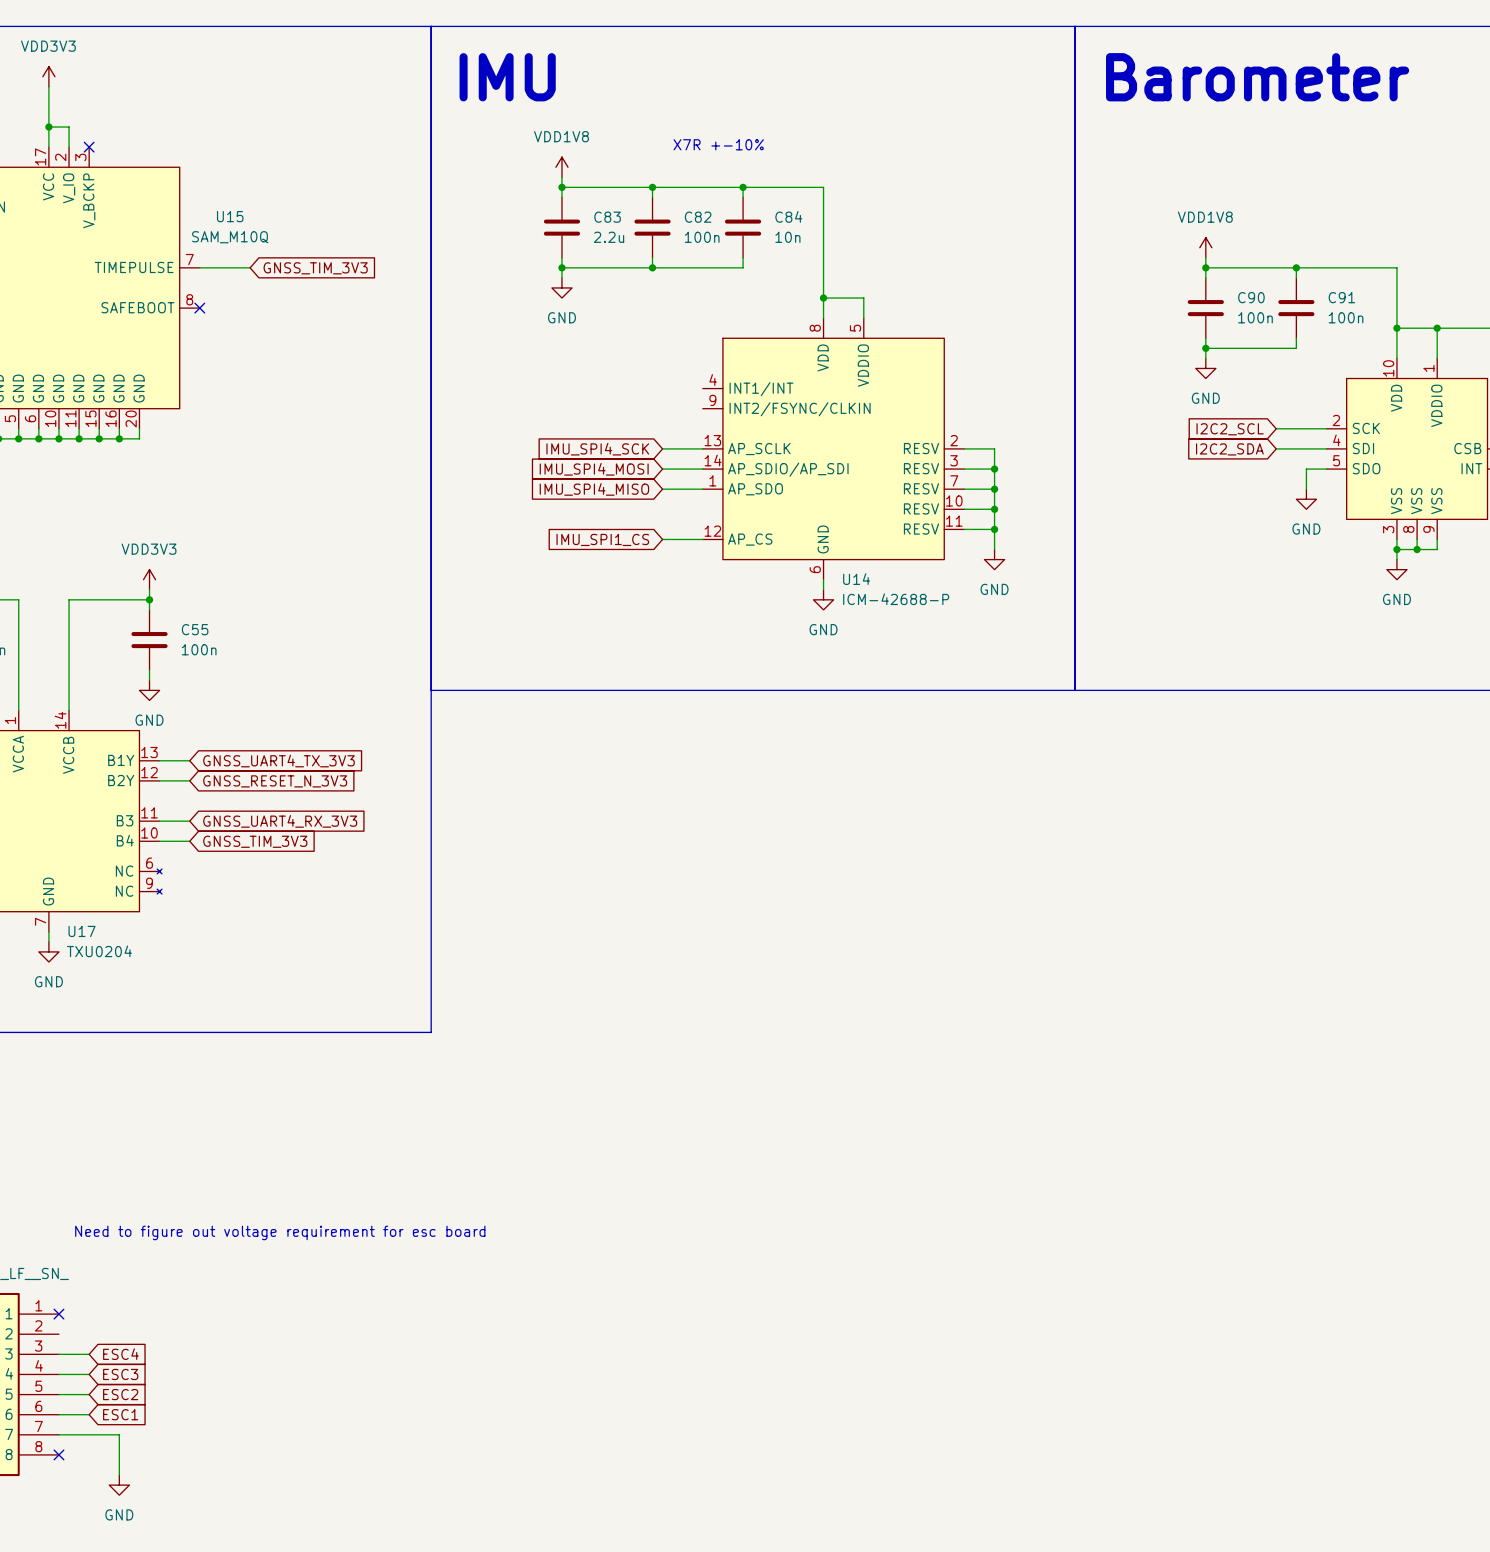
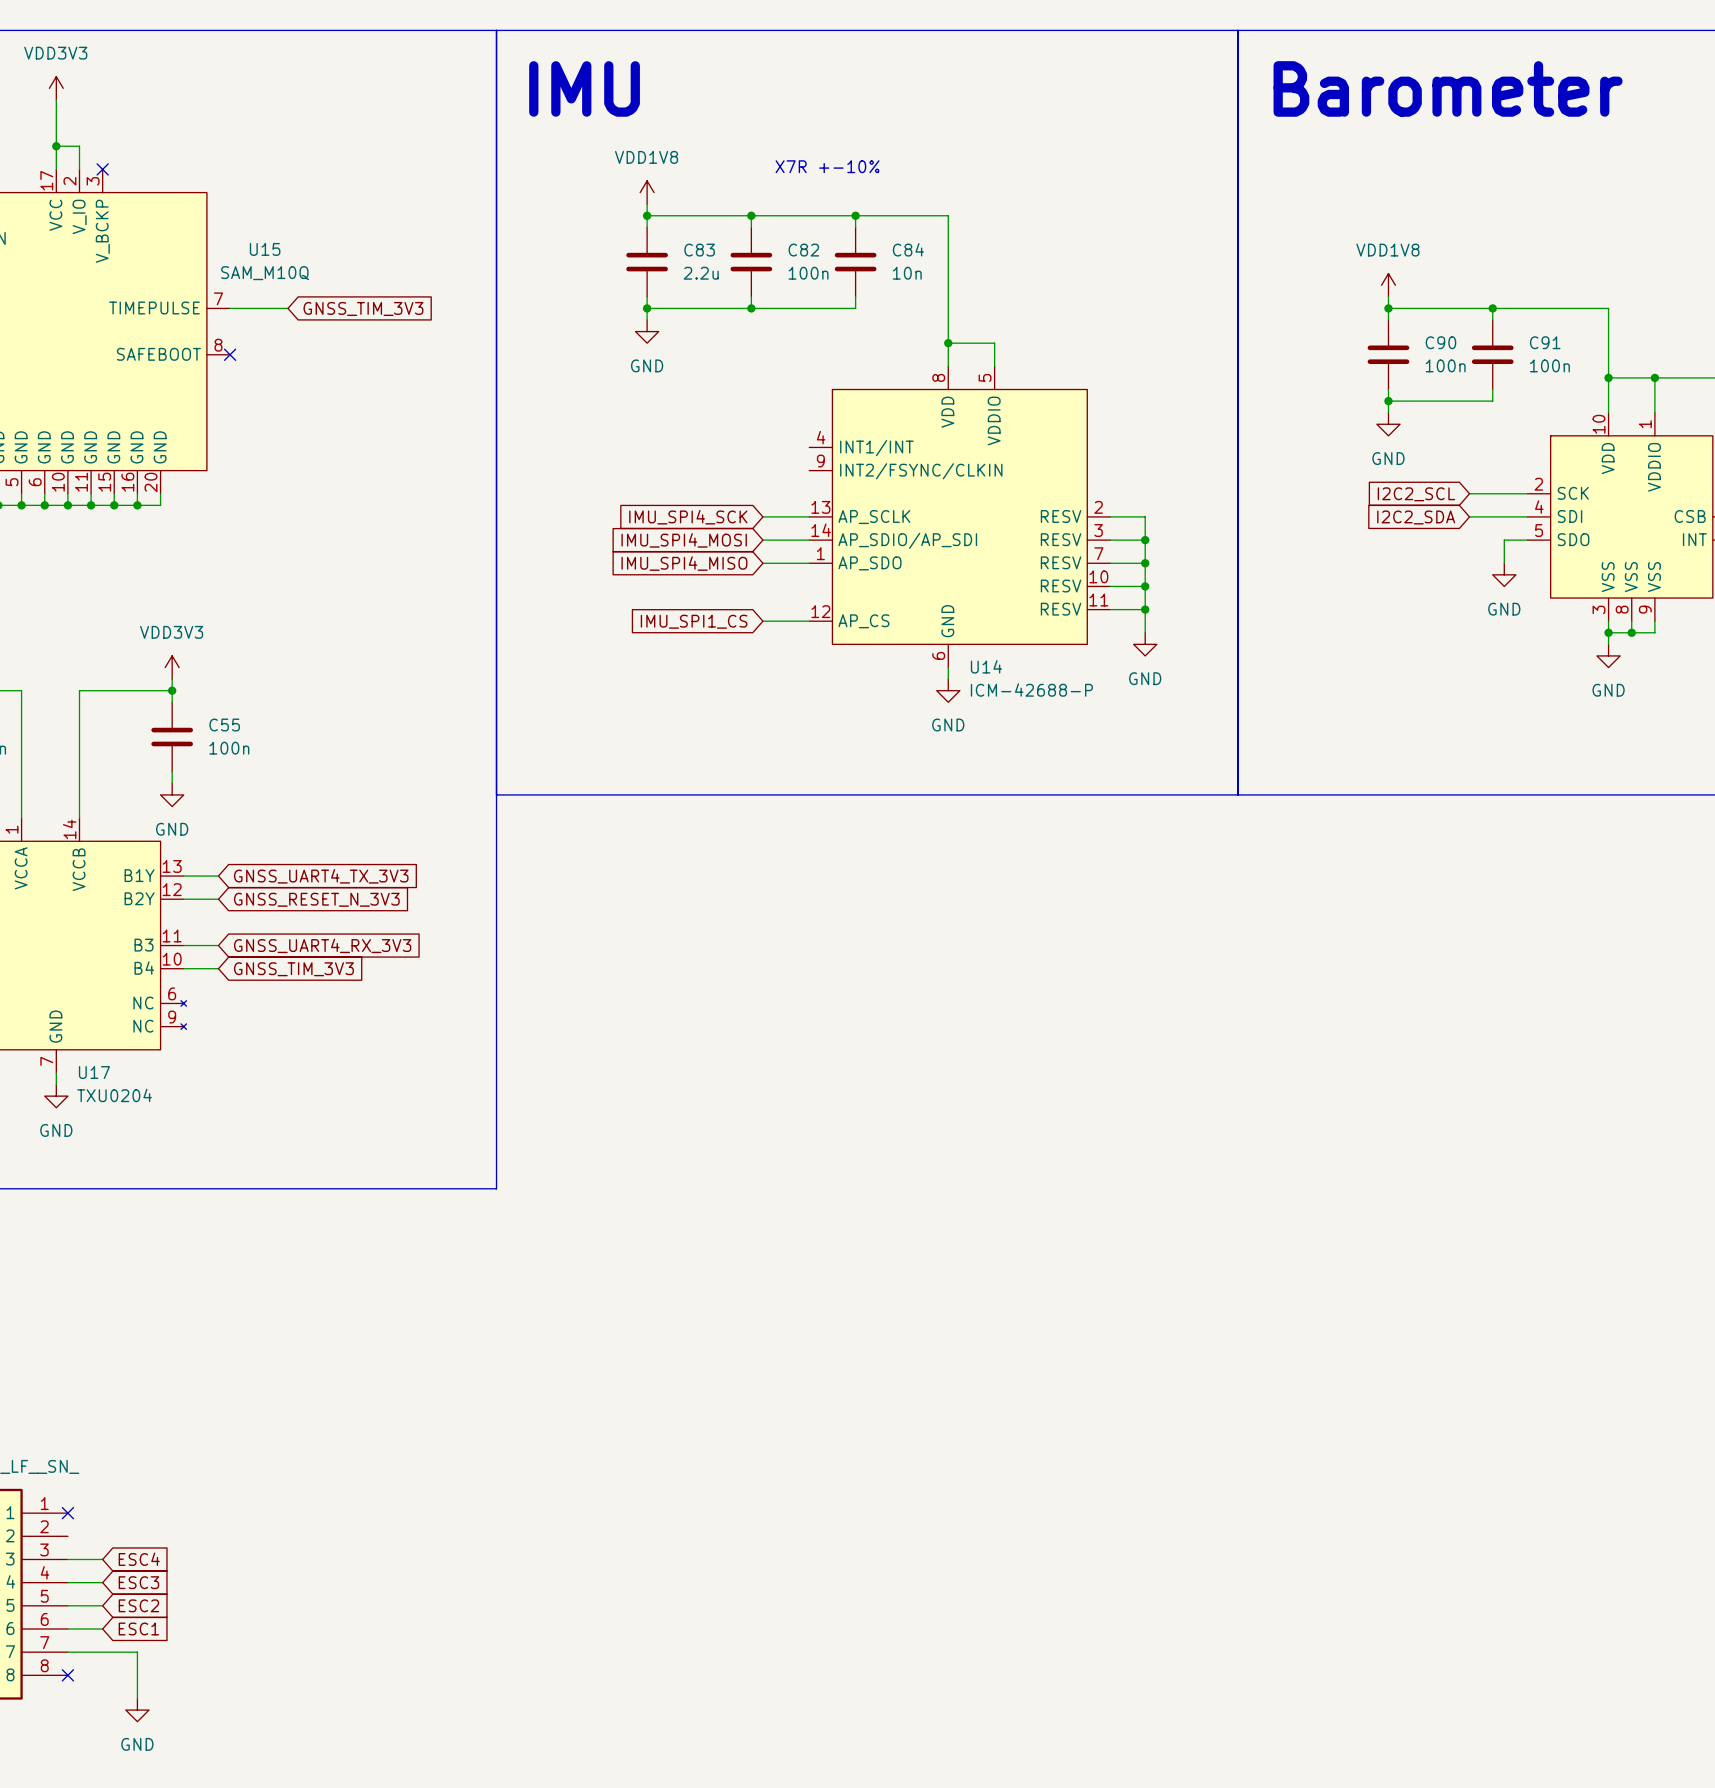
text: Need to figure out voltage requirement for esc board (280, 1232) -> none

